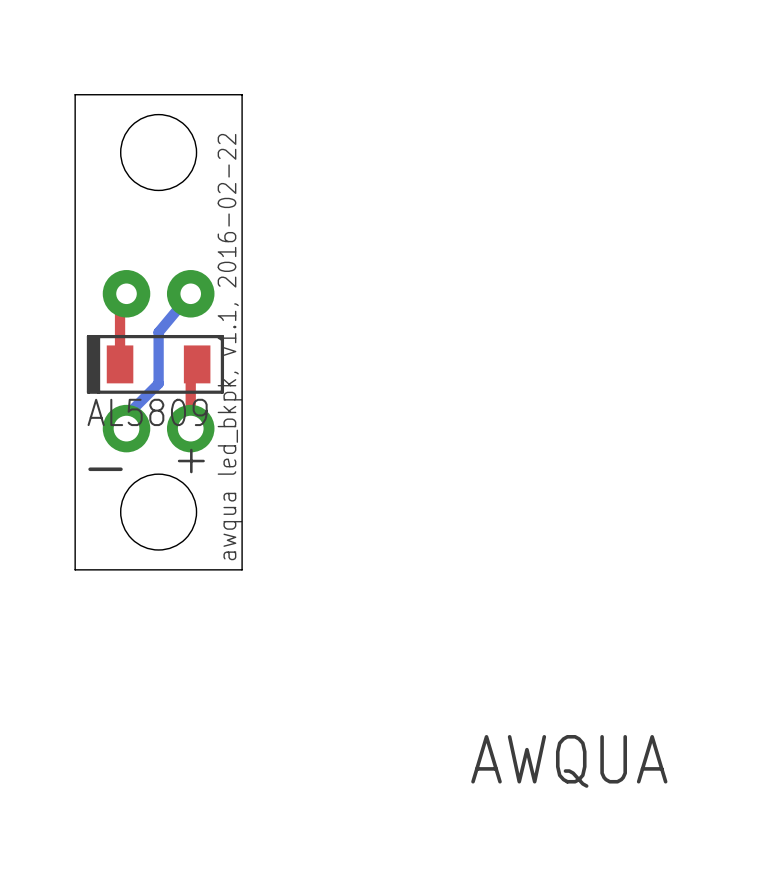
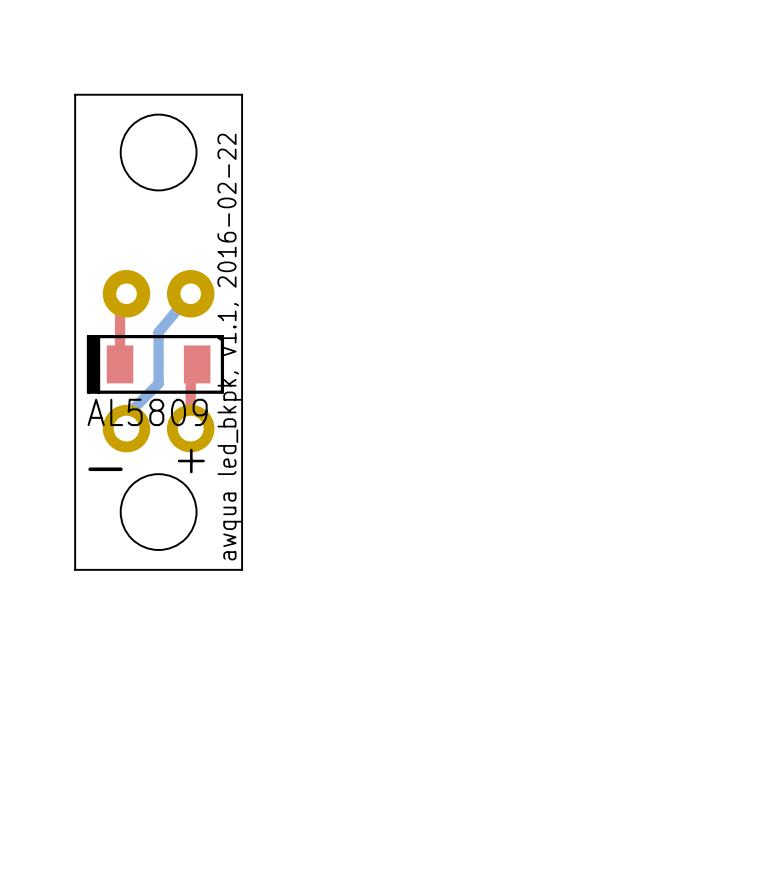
text: AWQUA (569, 761) -> none

